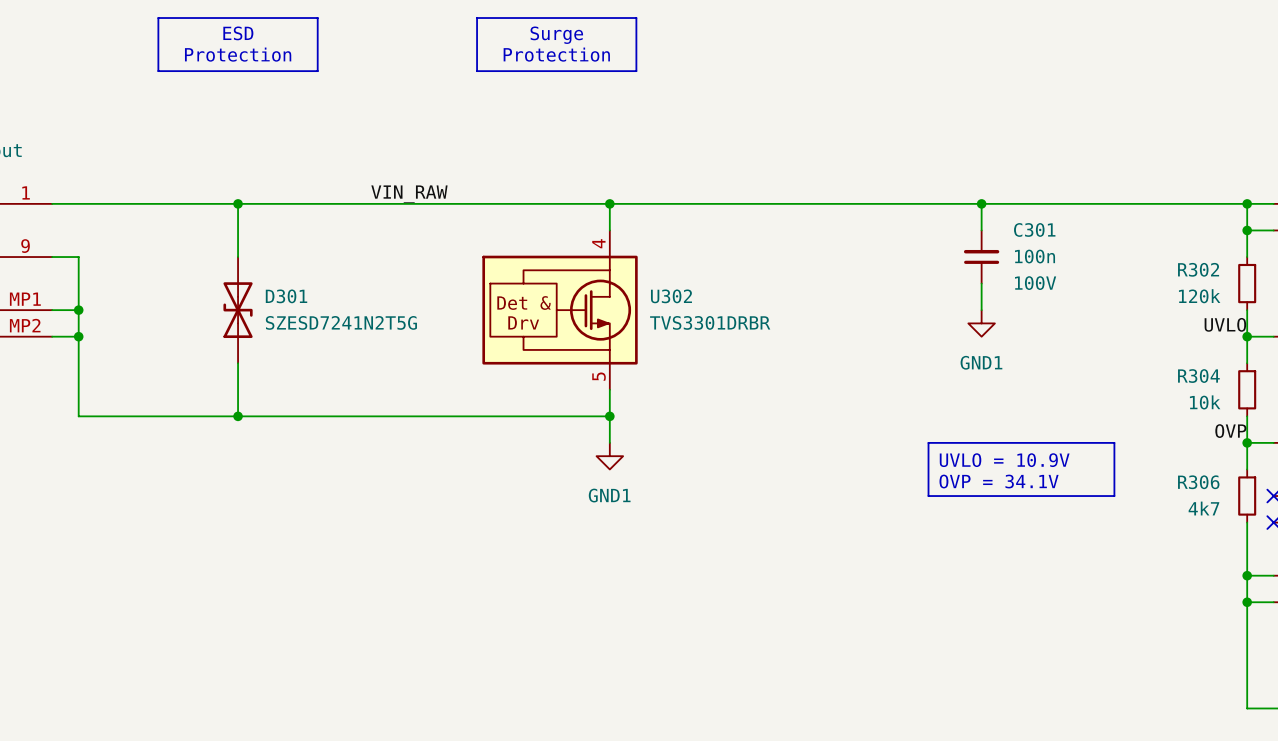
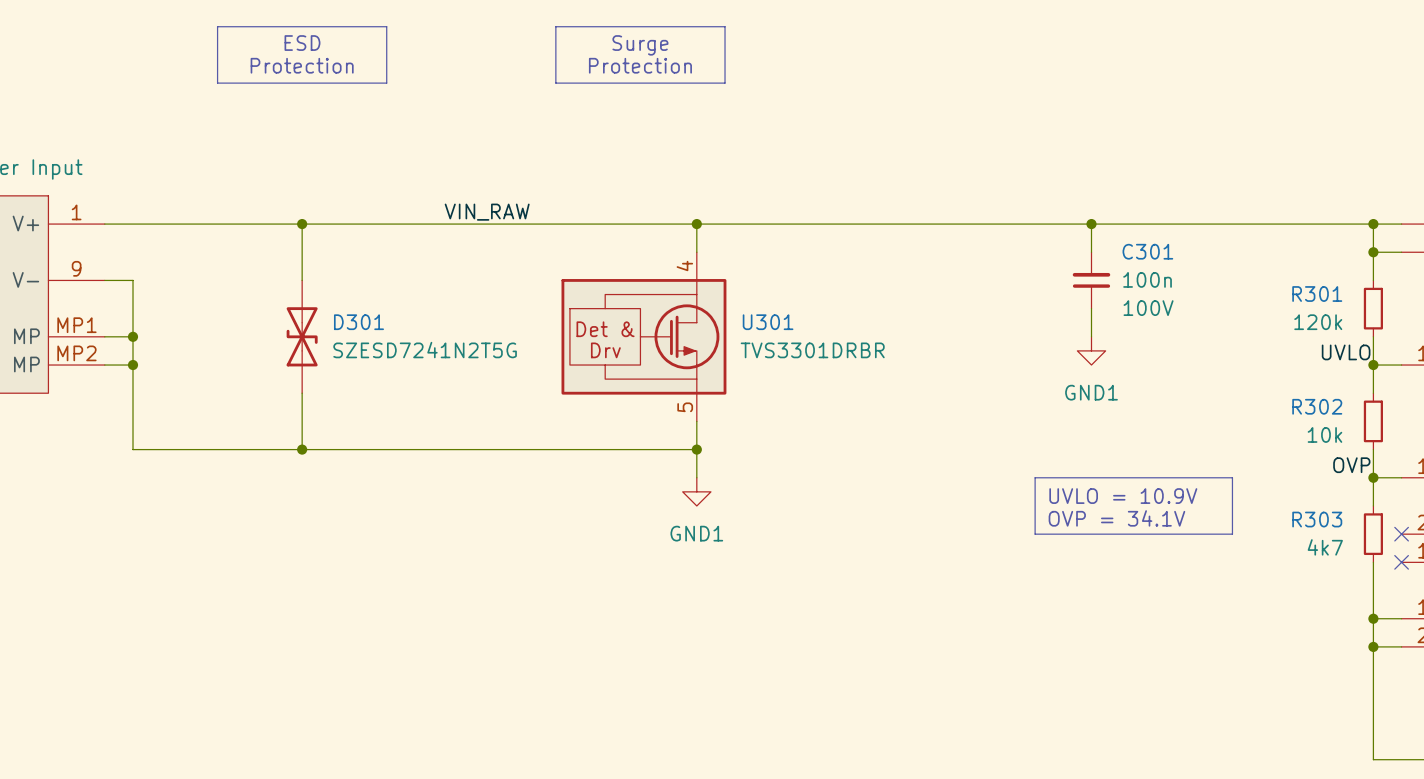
R302 name: R302 (1198, 269) -> R301 (1317, 294)
U302 name: U302 (671, 296) -> U301 (768, 322)
R304 name: R304 (1198, 376) -> R302 (1317, 406)
R306 name: R306 (1198, 482) -> R303 (1317, 519)

